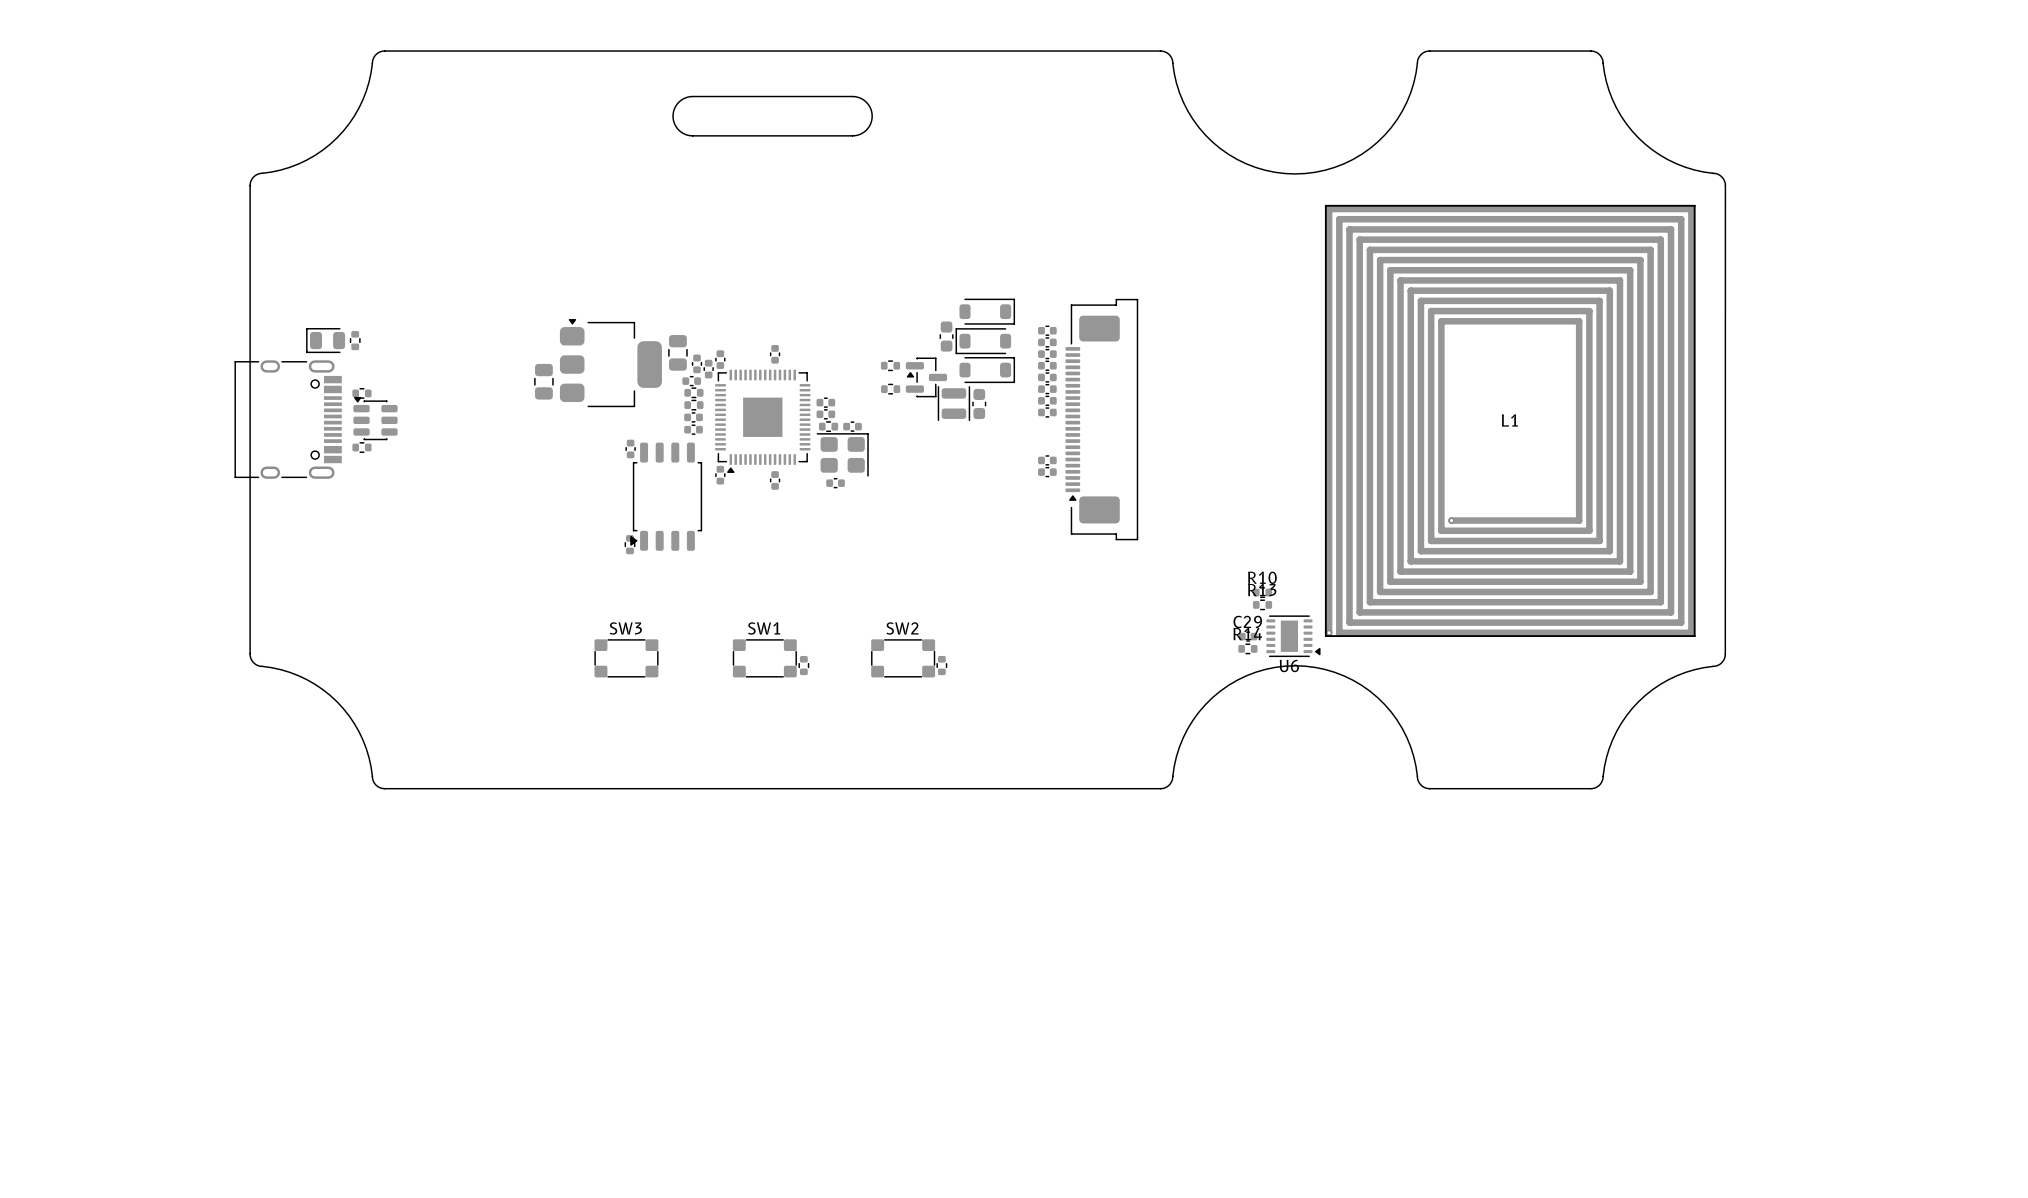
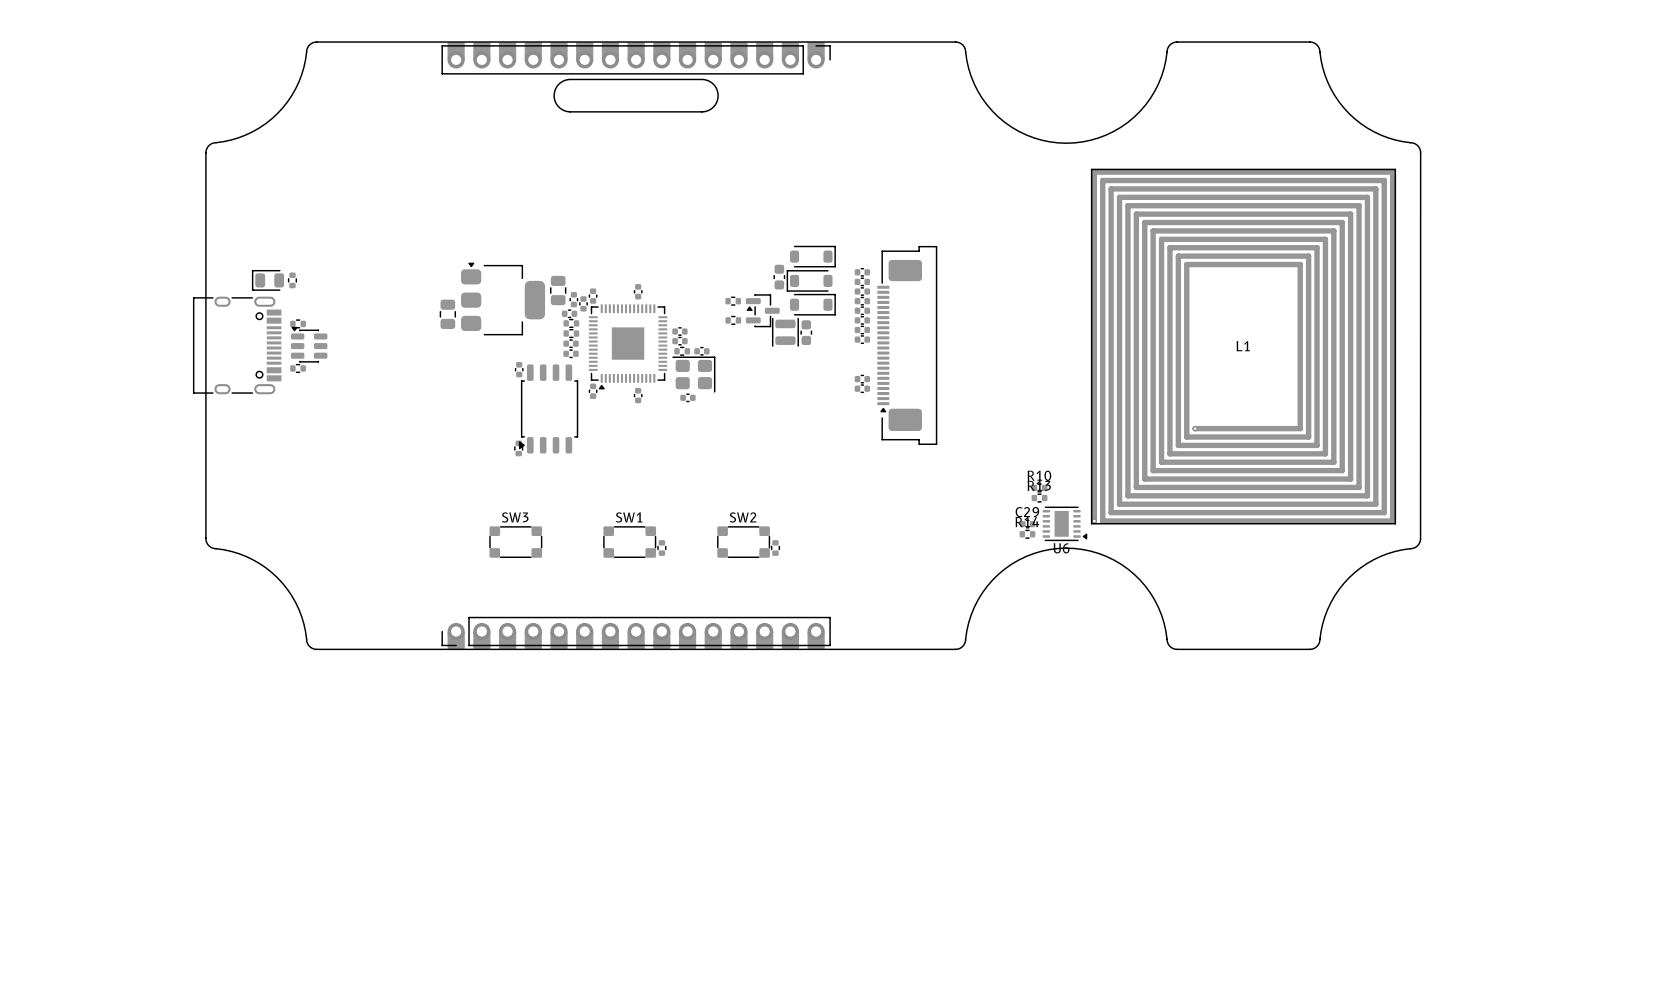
part: none -> (636, 58)
part: none -> (636, 632)

